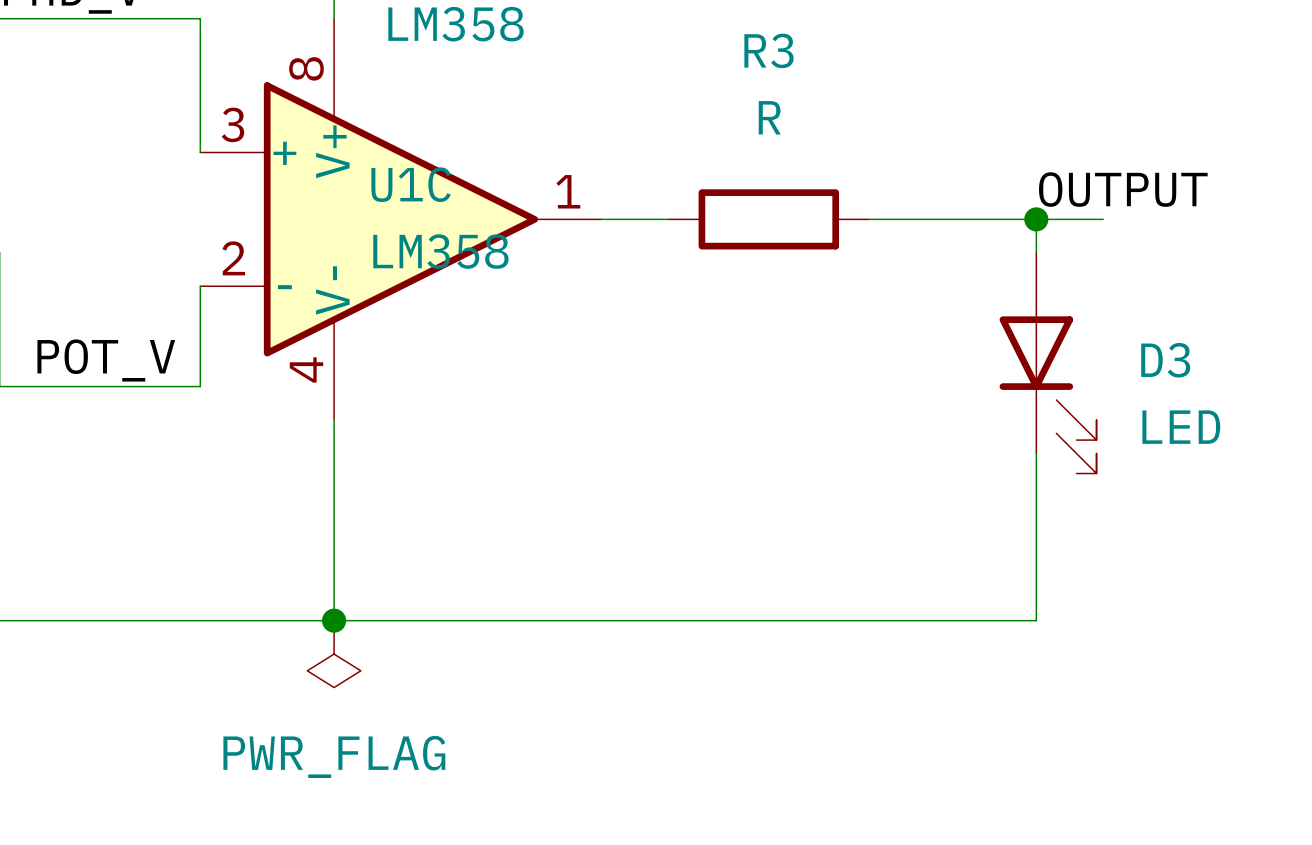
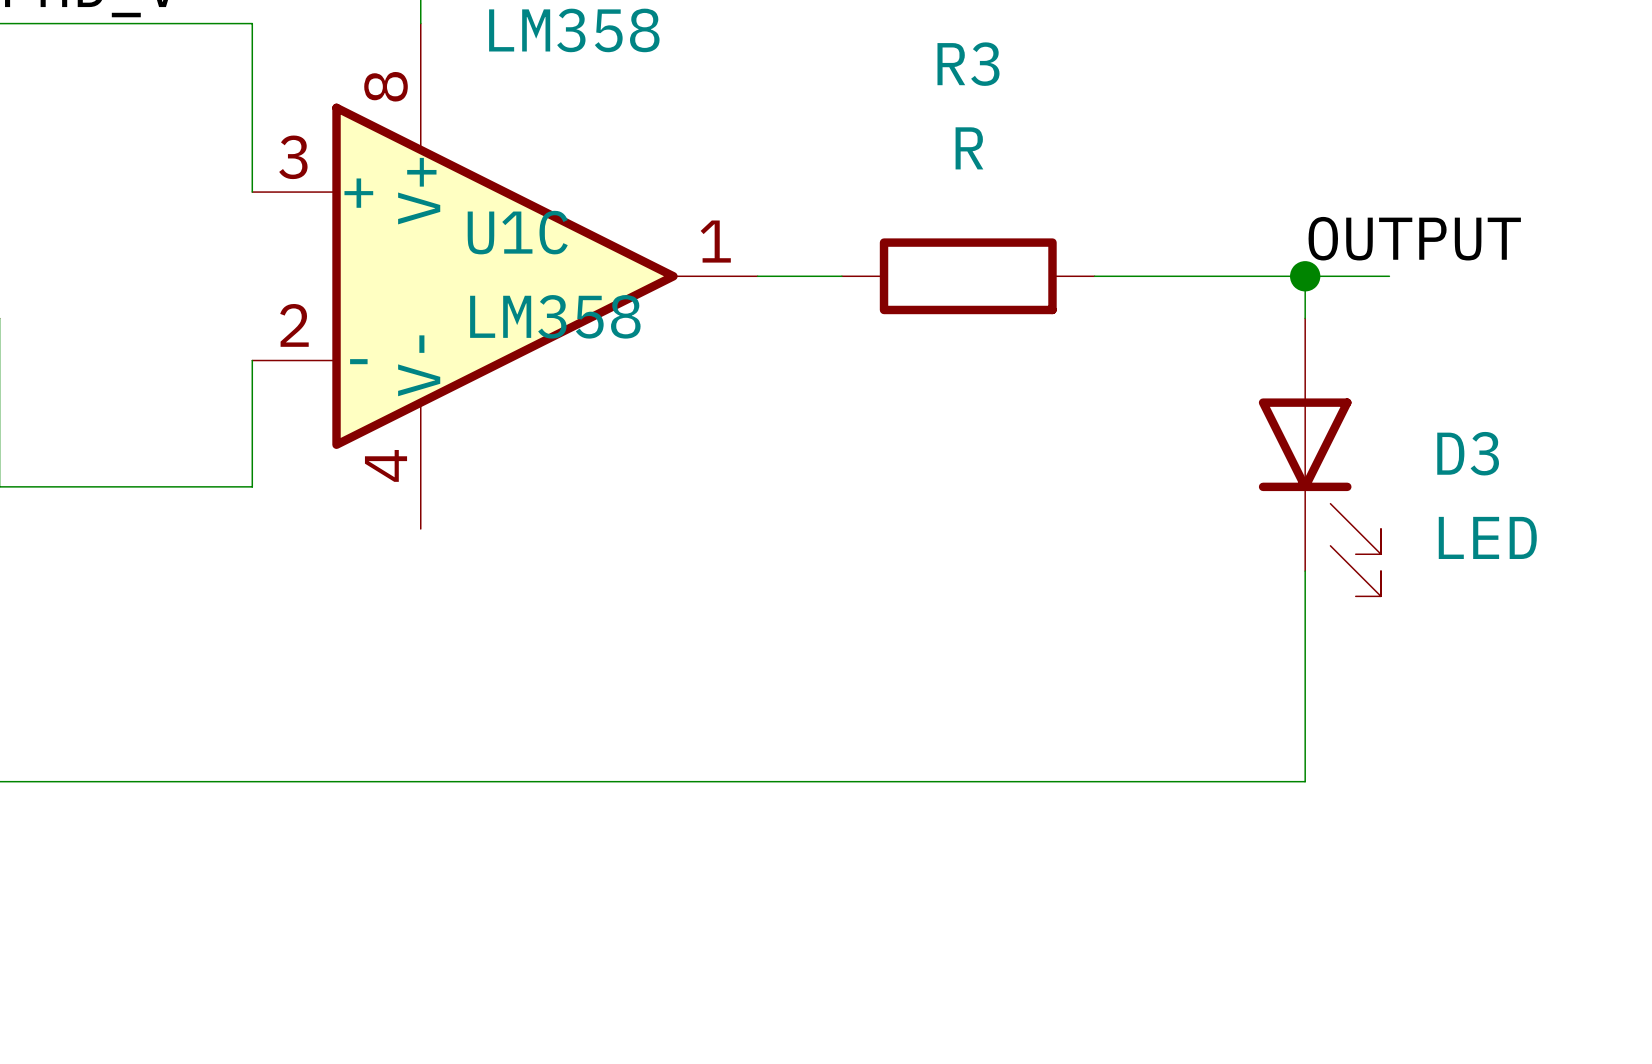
label: POT_V (106, 360) -> none
wire: (334, 420) (334, 620) -> none
junction: (334, 620) -> none
power symbol: PWR_FLAG (334, 654) -> none

